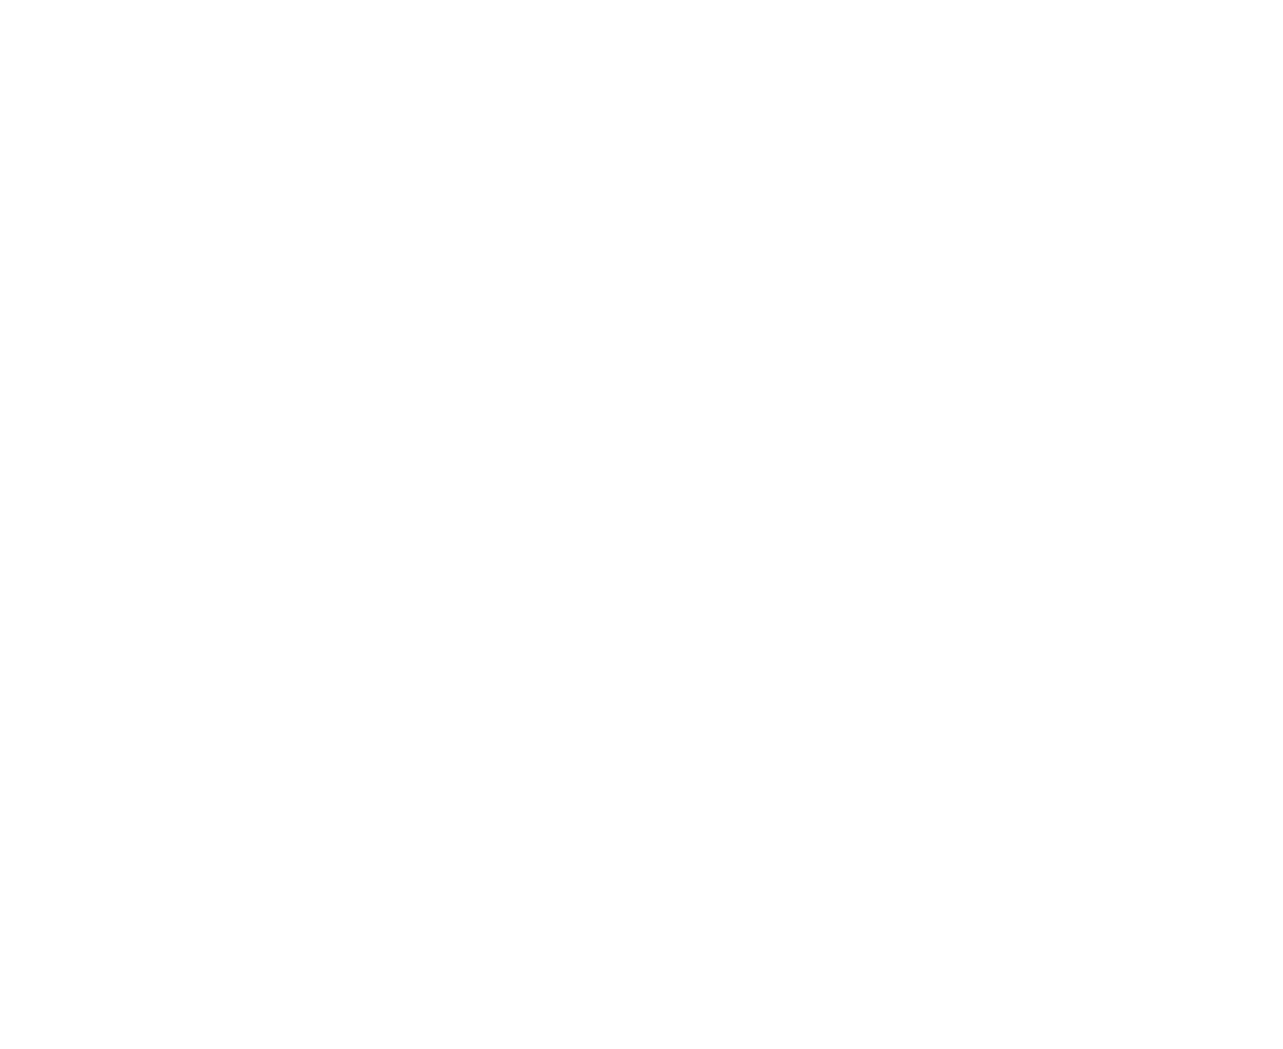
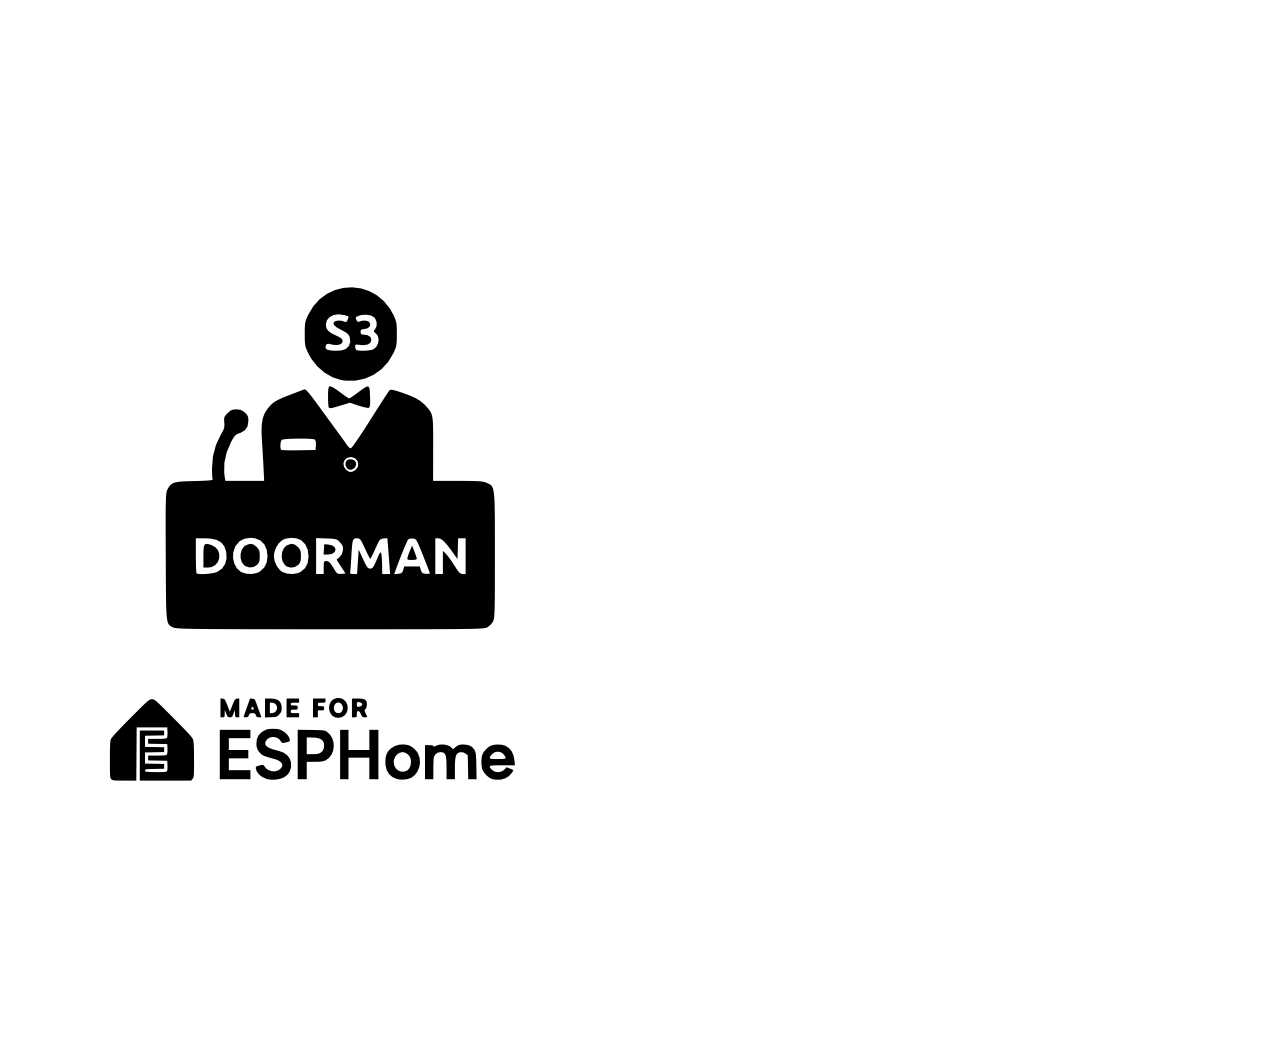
drawing: none -> [165, 287, 495, 630]
drawing: none -> [109, 697, 515, 781]

